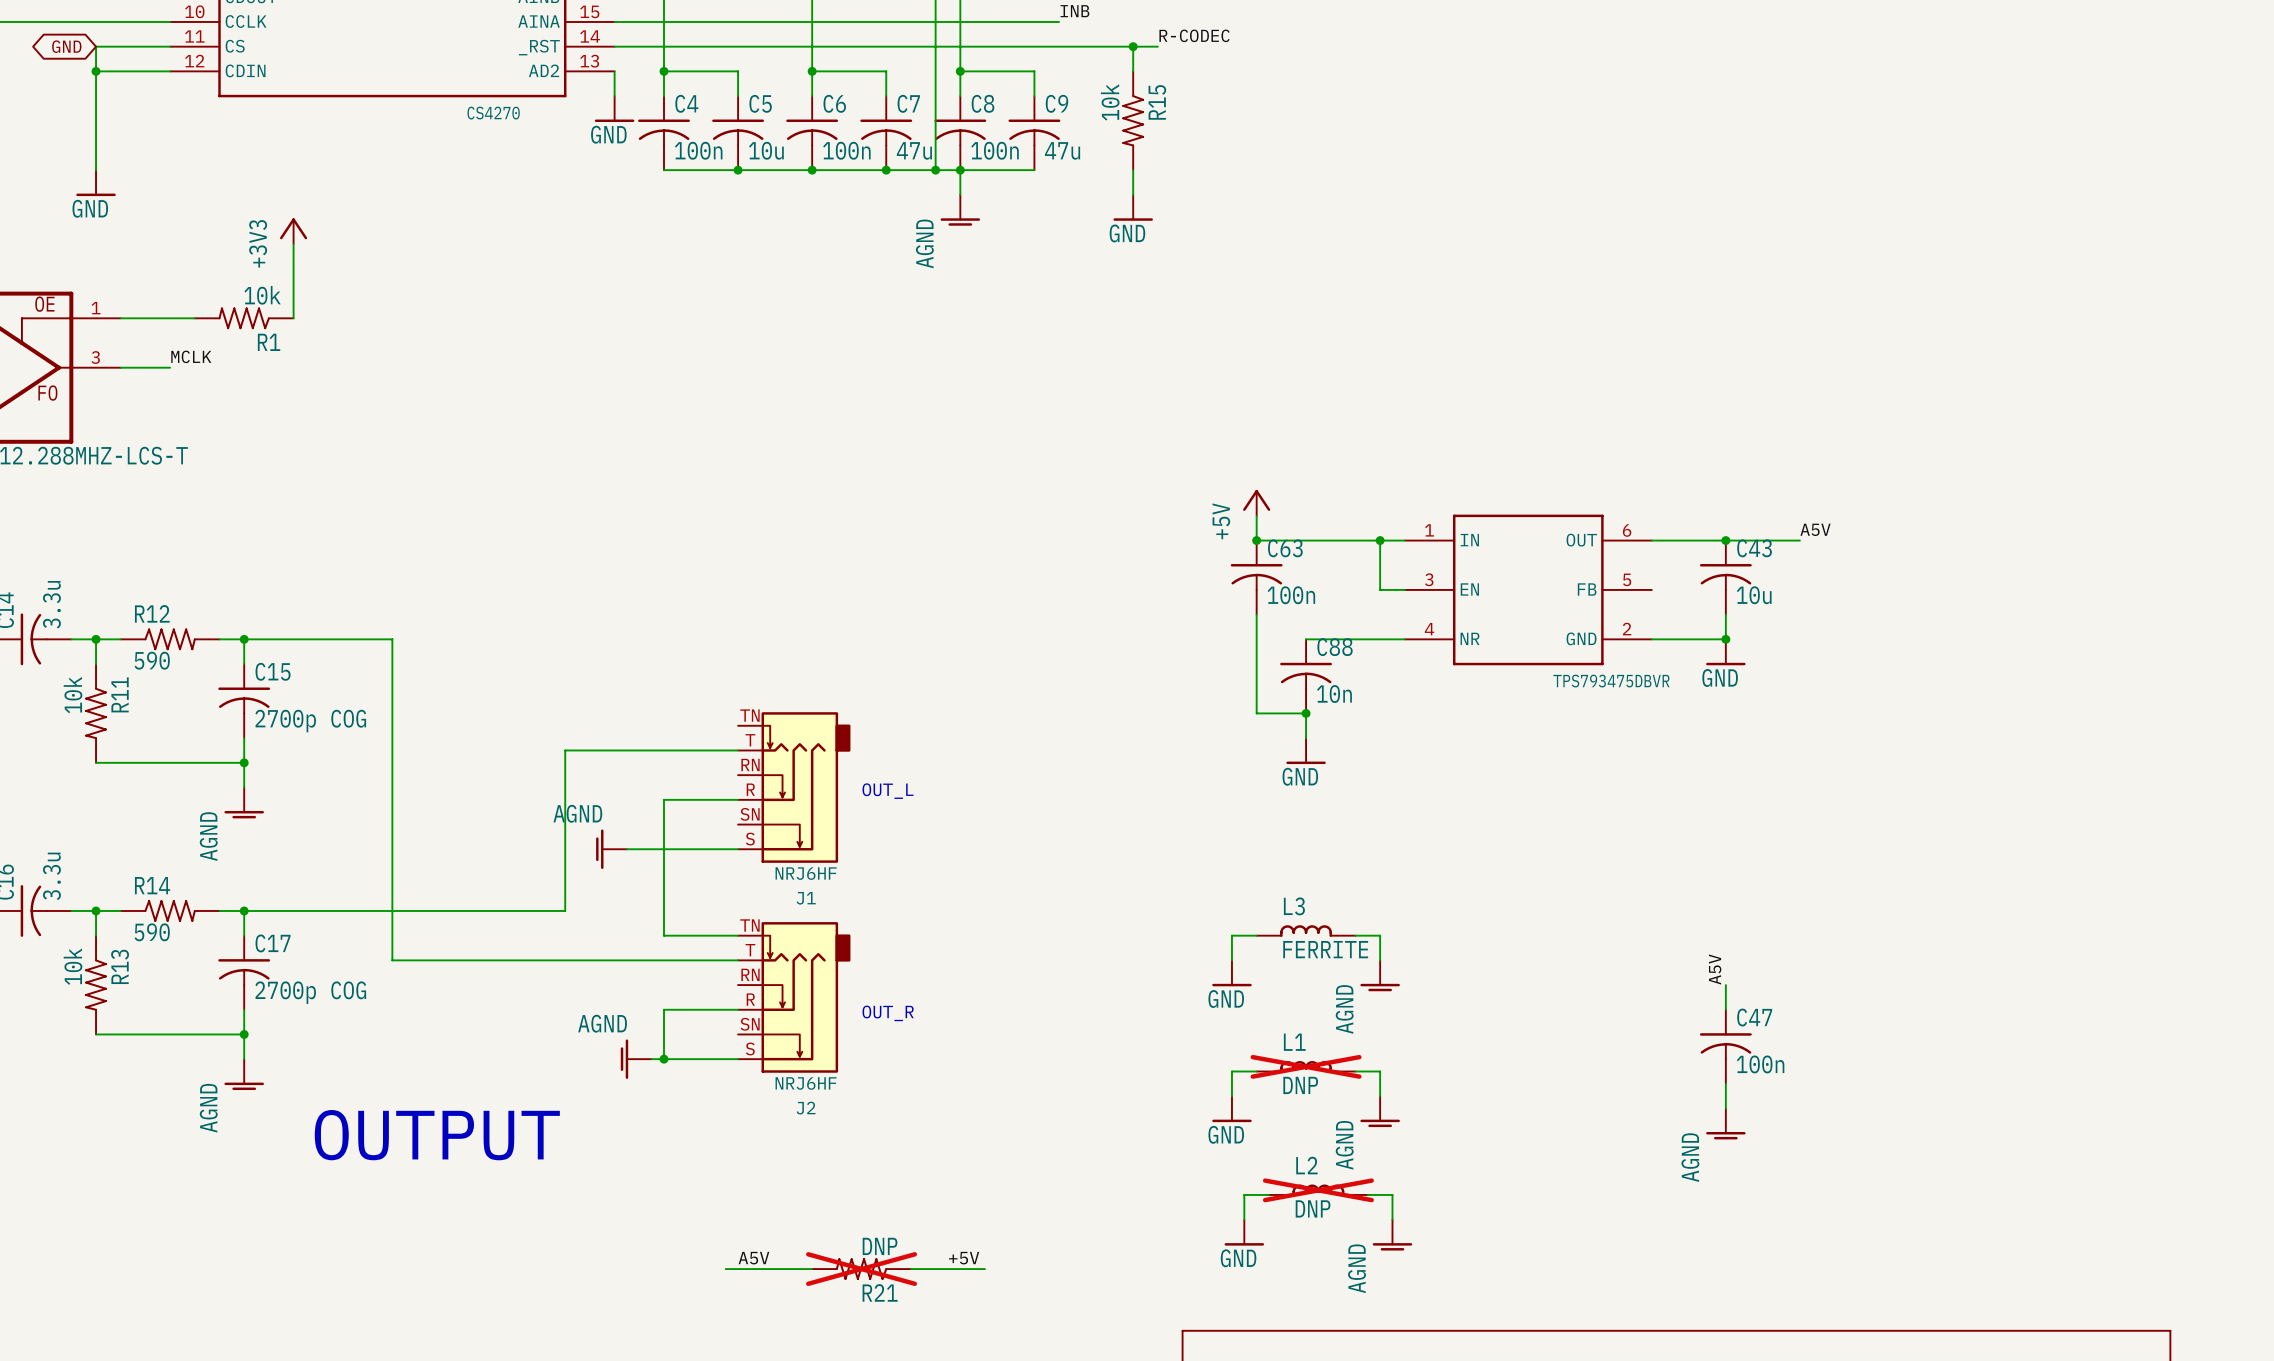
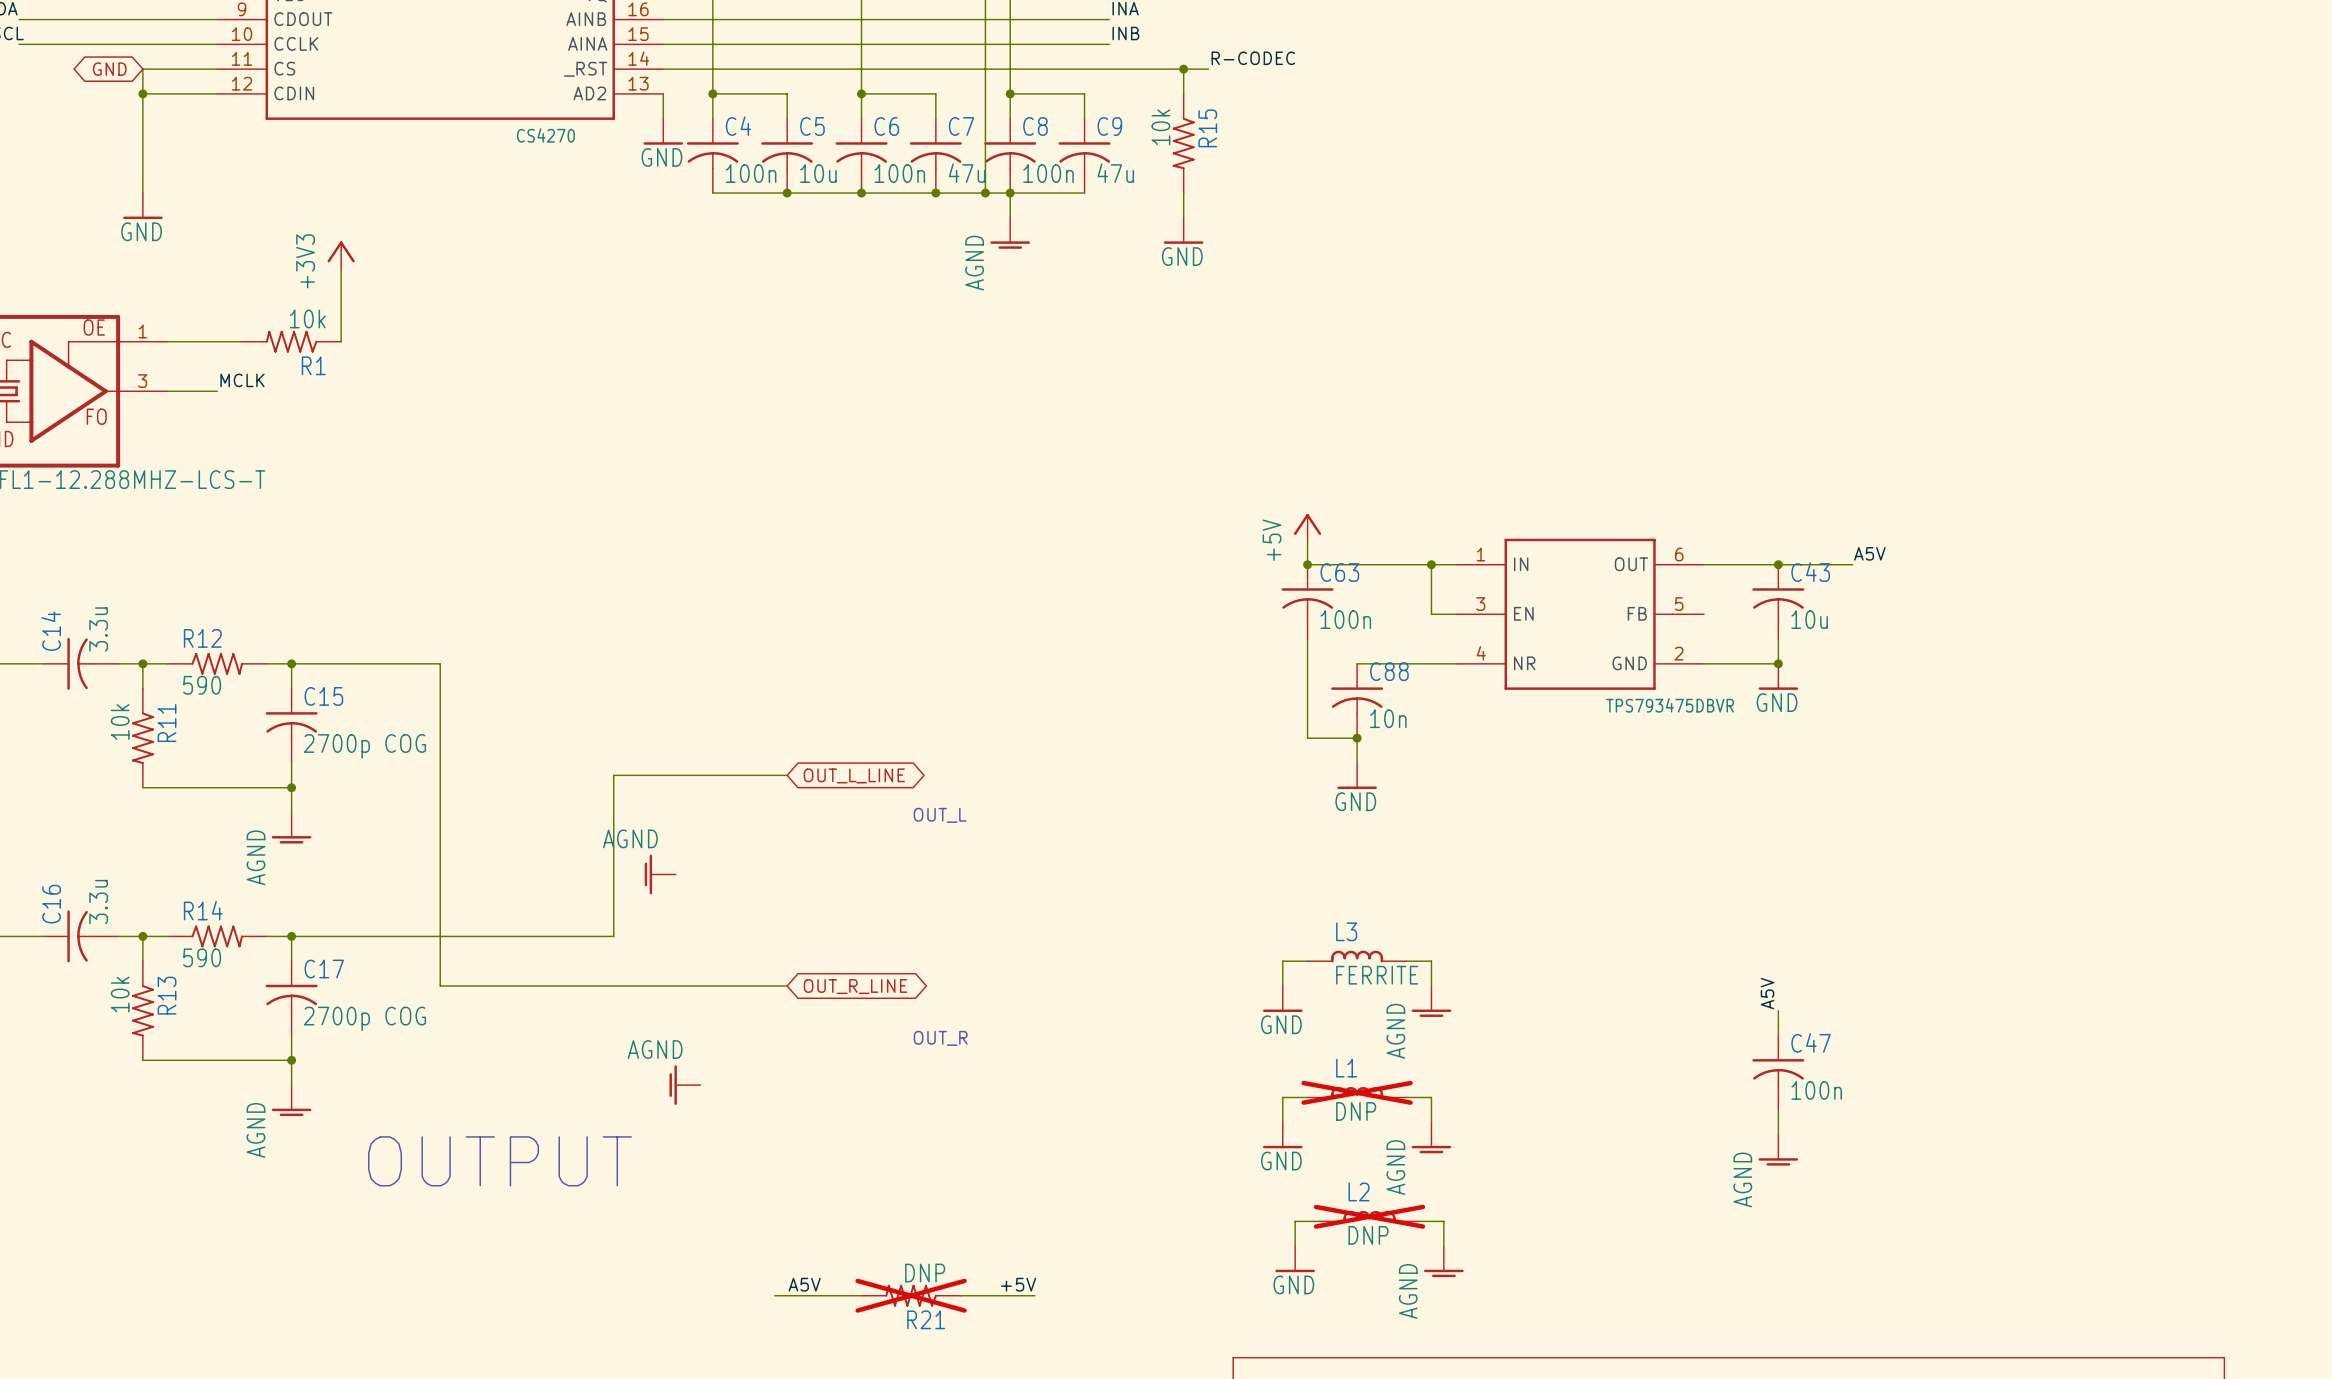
global label: none -> OUT_L_LINE (854, 775)
J1: NRJ6HF (794, 787) -> none
wire: (738, 799) (664, 799) (664, 935) (738, 935) -> none
wire: (626, 849) (738, 849) -> none
global label: none -> OUT_R_LINE (855, 986)
J2: NRJ6HF (794, 997) -> none
wire: (738, 1009) (664, 1009) (664, 1059) -> none
wire: (651, 1059) (738, 1059) -> none
junction: (664, 1059) -> none

